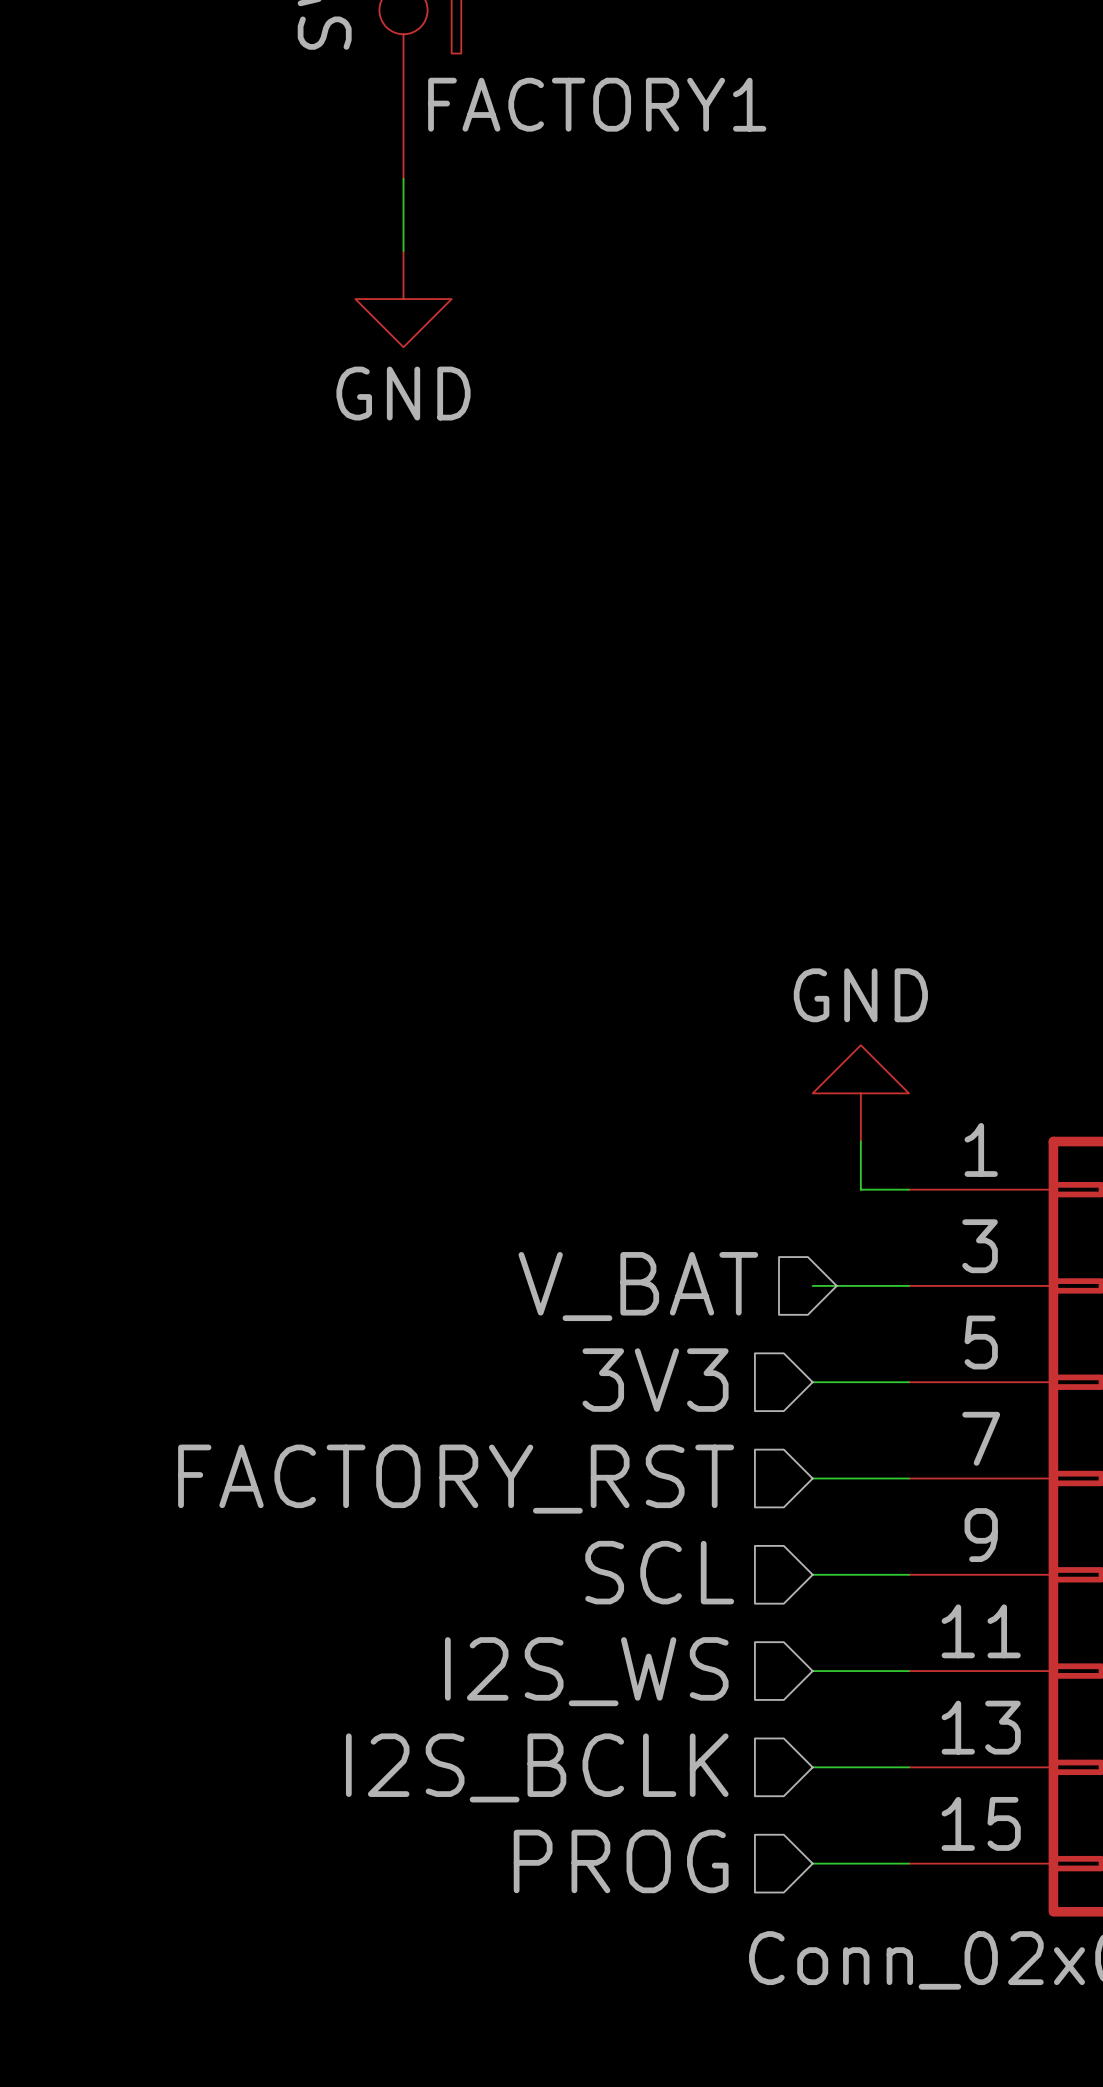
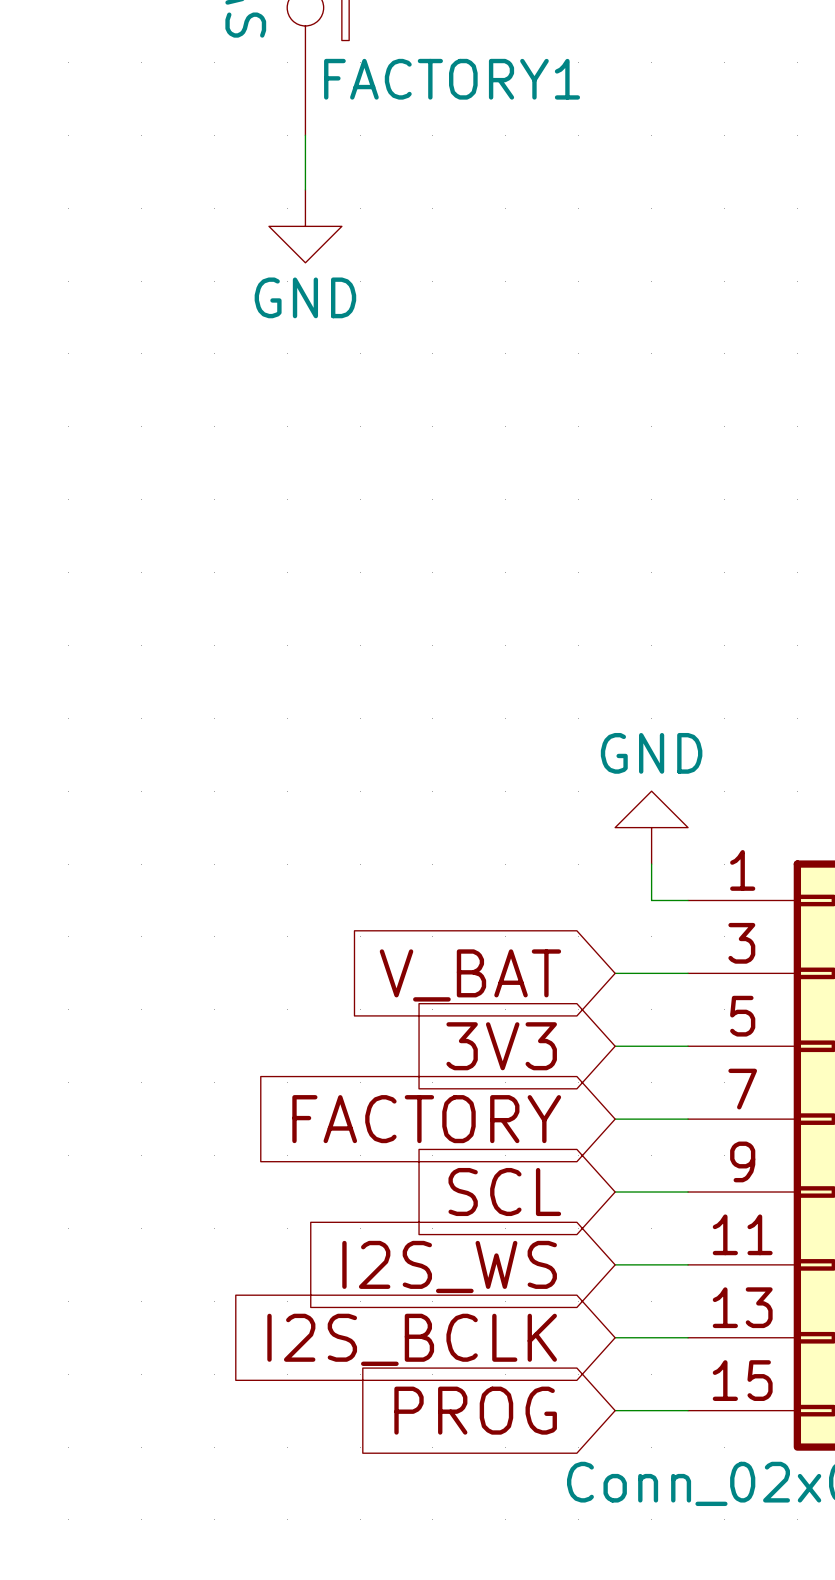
hierarchical label: V_BAT (638, 1286) -> none
global label: none -> V_BAT (470, 975)
hierarchical label: 3V3 (655, 1380) -> none
global label: none -> 3V3 (501, 1046)
global label: none -> FACTORY (426, 1119)
hierarchical label: FACTORY_RST (456, 1479) -> none
hierarchical label: SCL (659, 1572) -> none
global label: none -> SCL (504, 1192)
hierarchical label: I2S_WS (586, 1671) -> none
global label: none -> I2S_WS (449, 1266)
hierarchical label: I2S_BCLK (537, 1767) -> none
global label: none -> I2S_BCLK (412, 1339)
hierarchical label: PROG (621, 1861) -> none
global label: none -> PROG (475, 1410)

